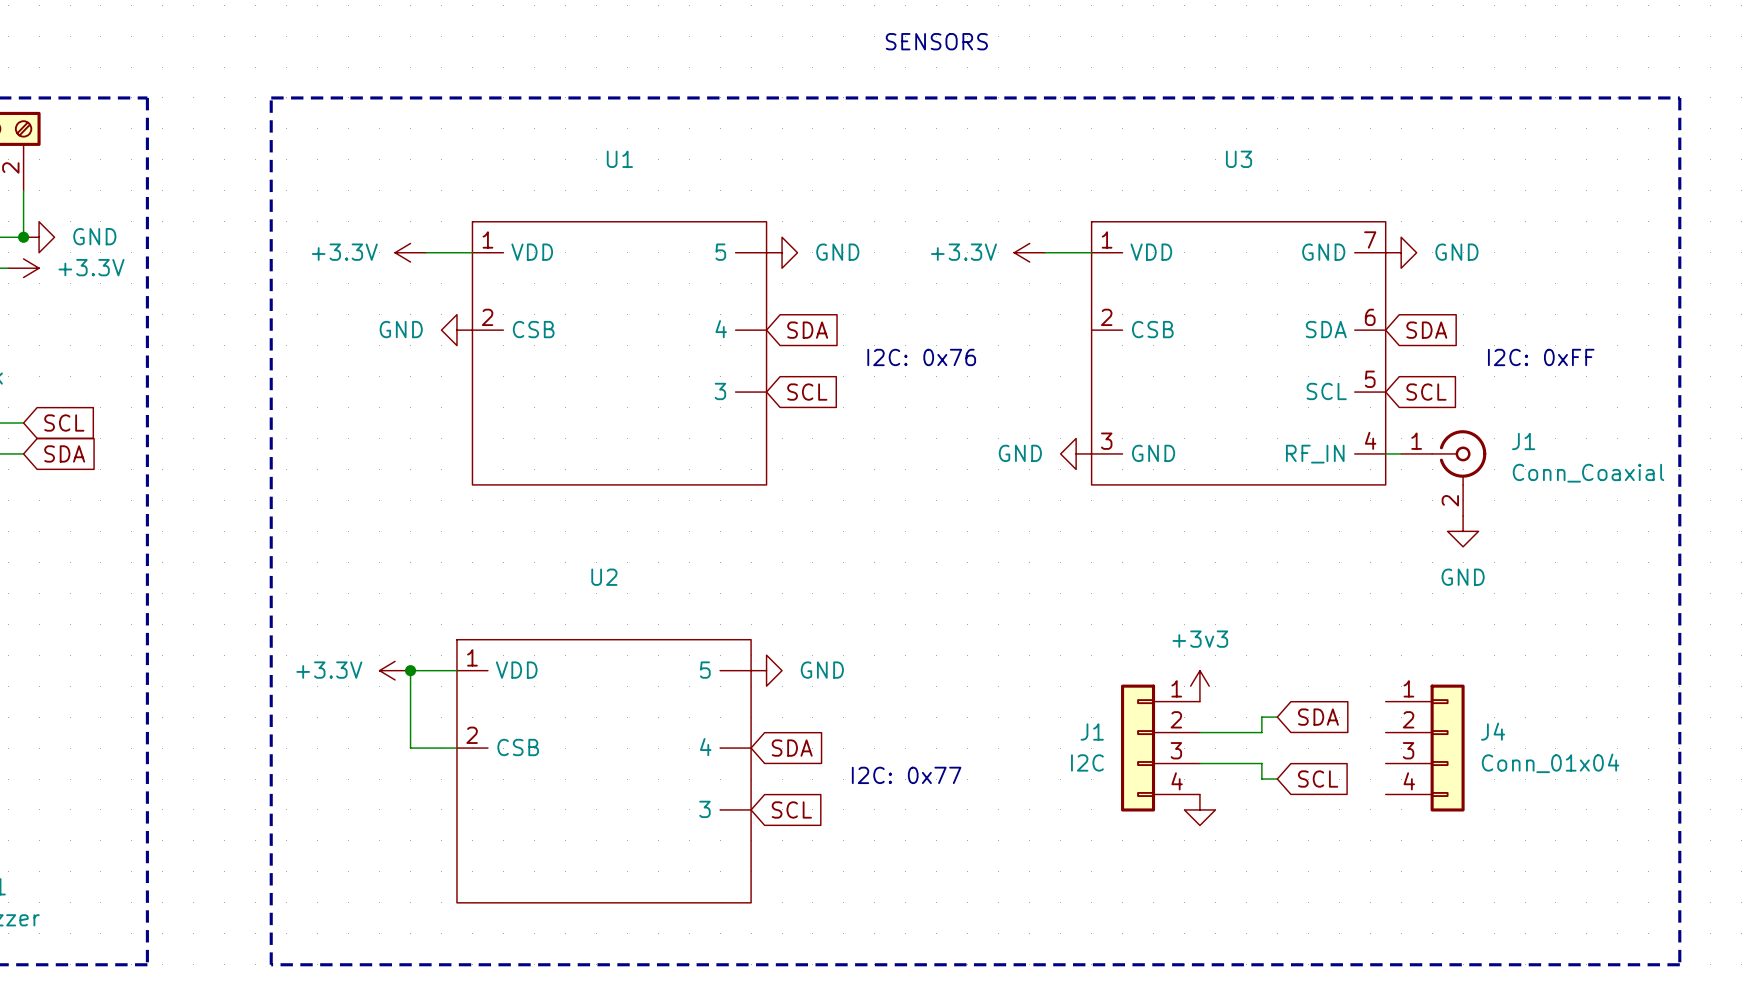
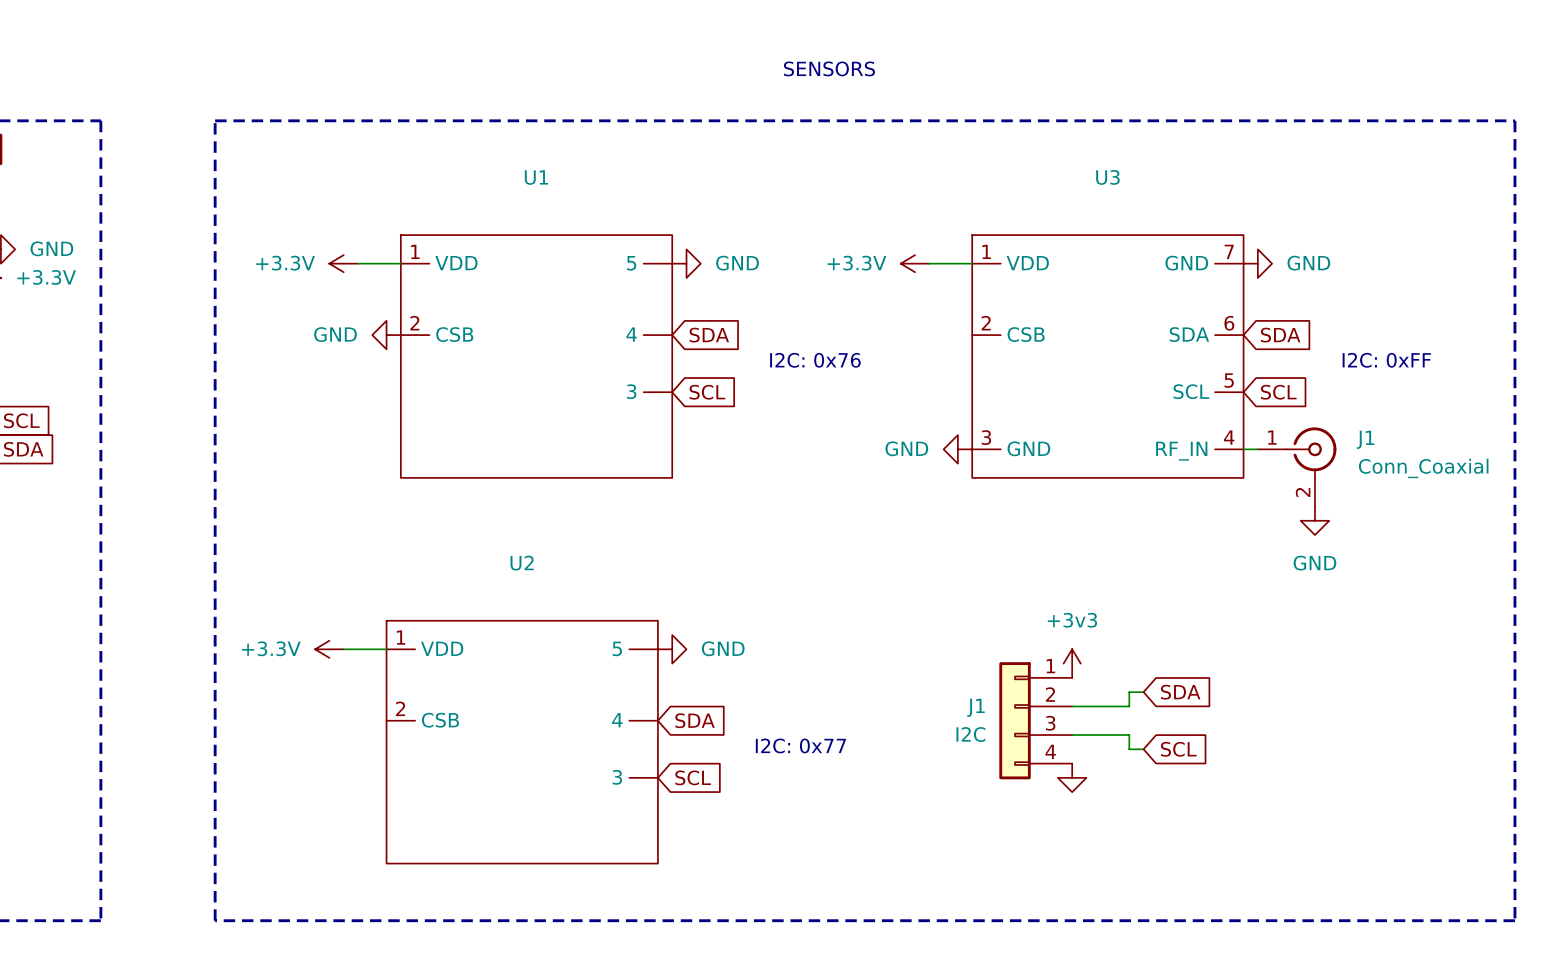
wire: (410, 670) (410, 748) (456, 748) -> none
junction: (410, 670) -> none
J4: Conn_01x04 (1425, 748) -> none

